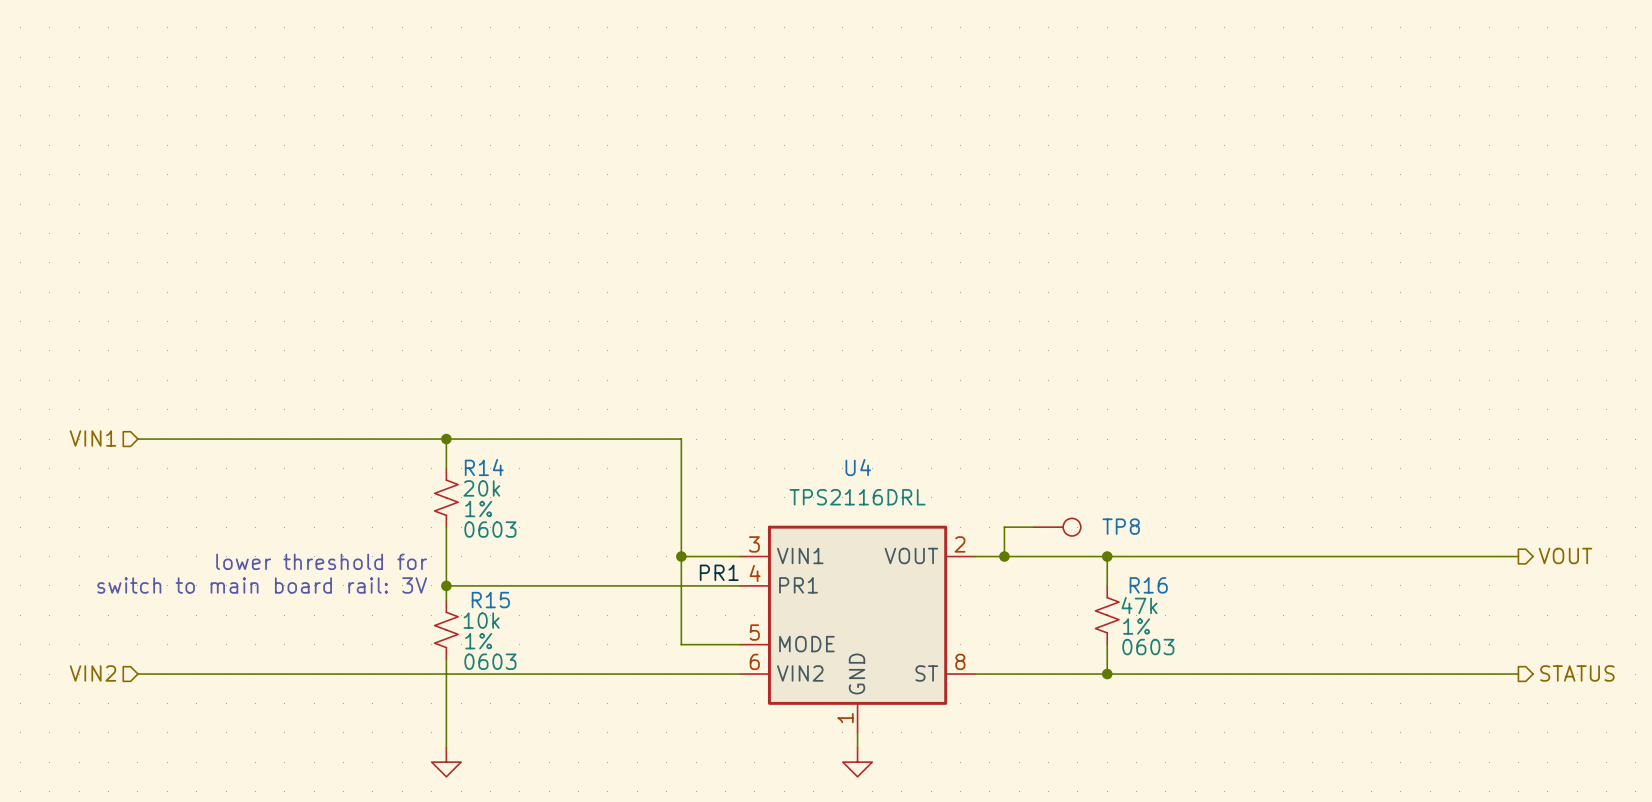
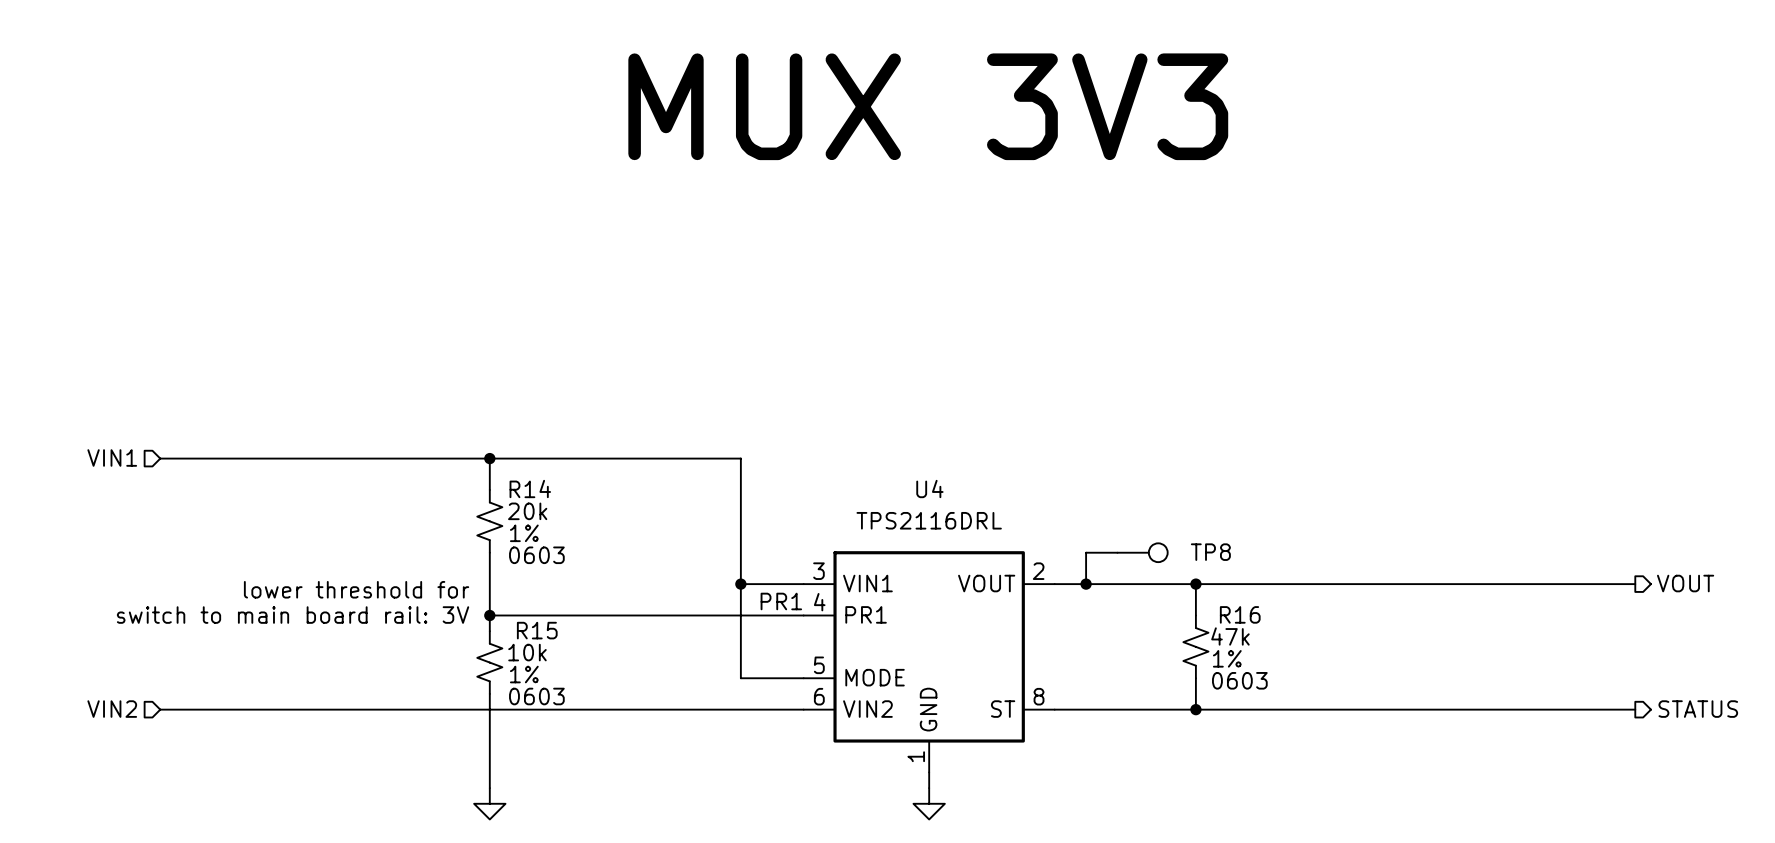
text: none -> MUX 3V3 (928, 106)

